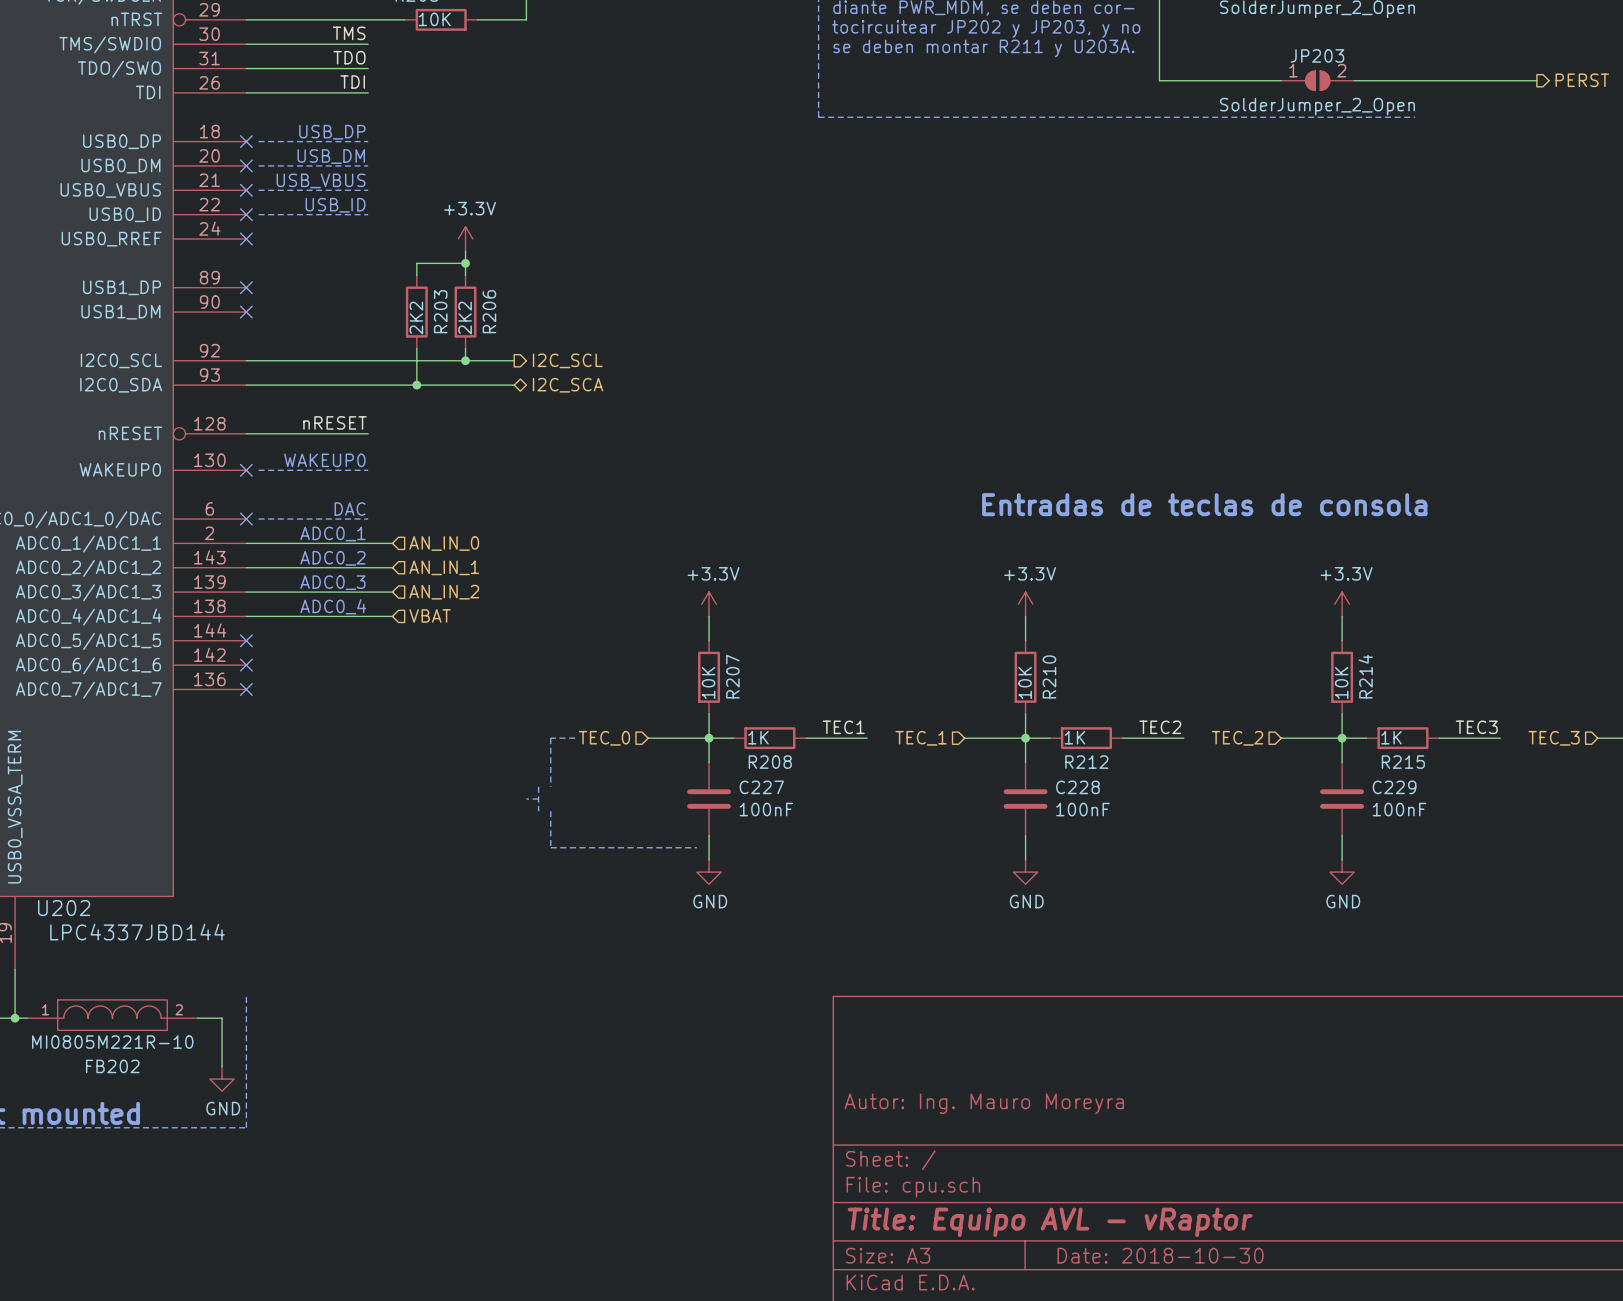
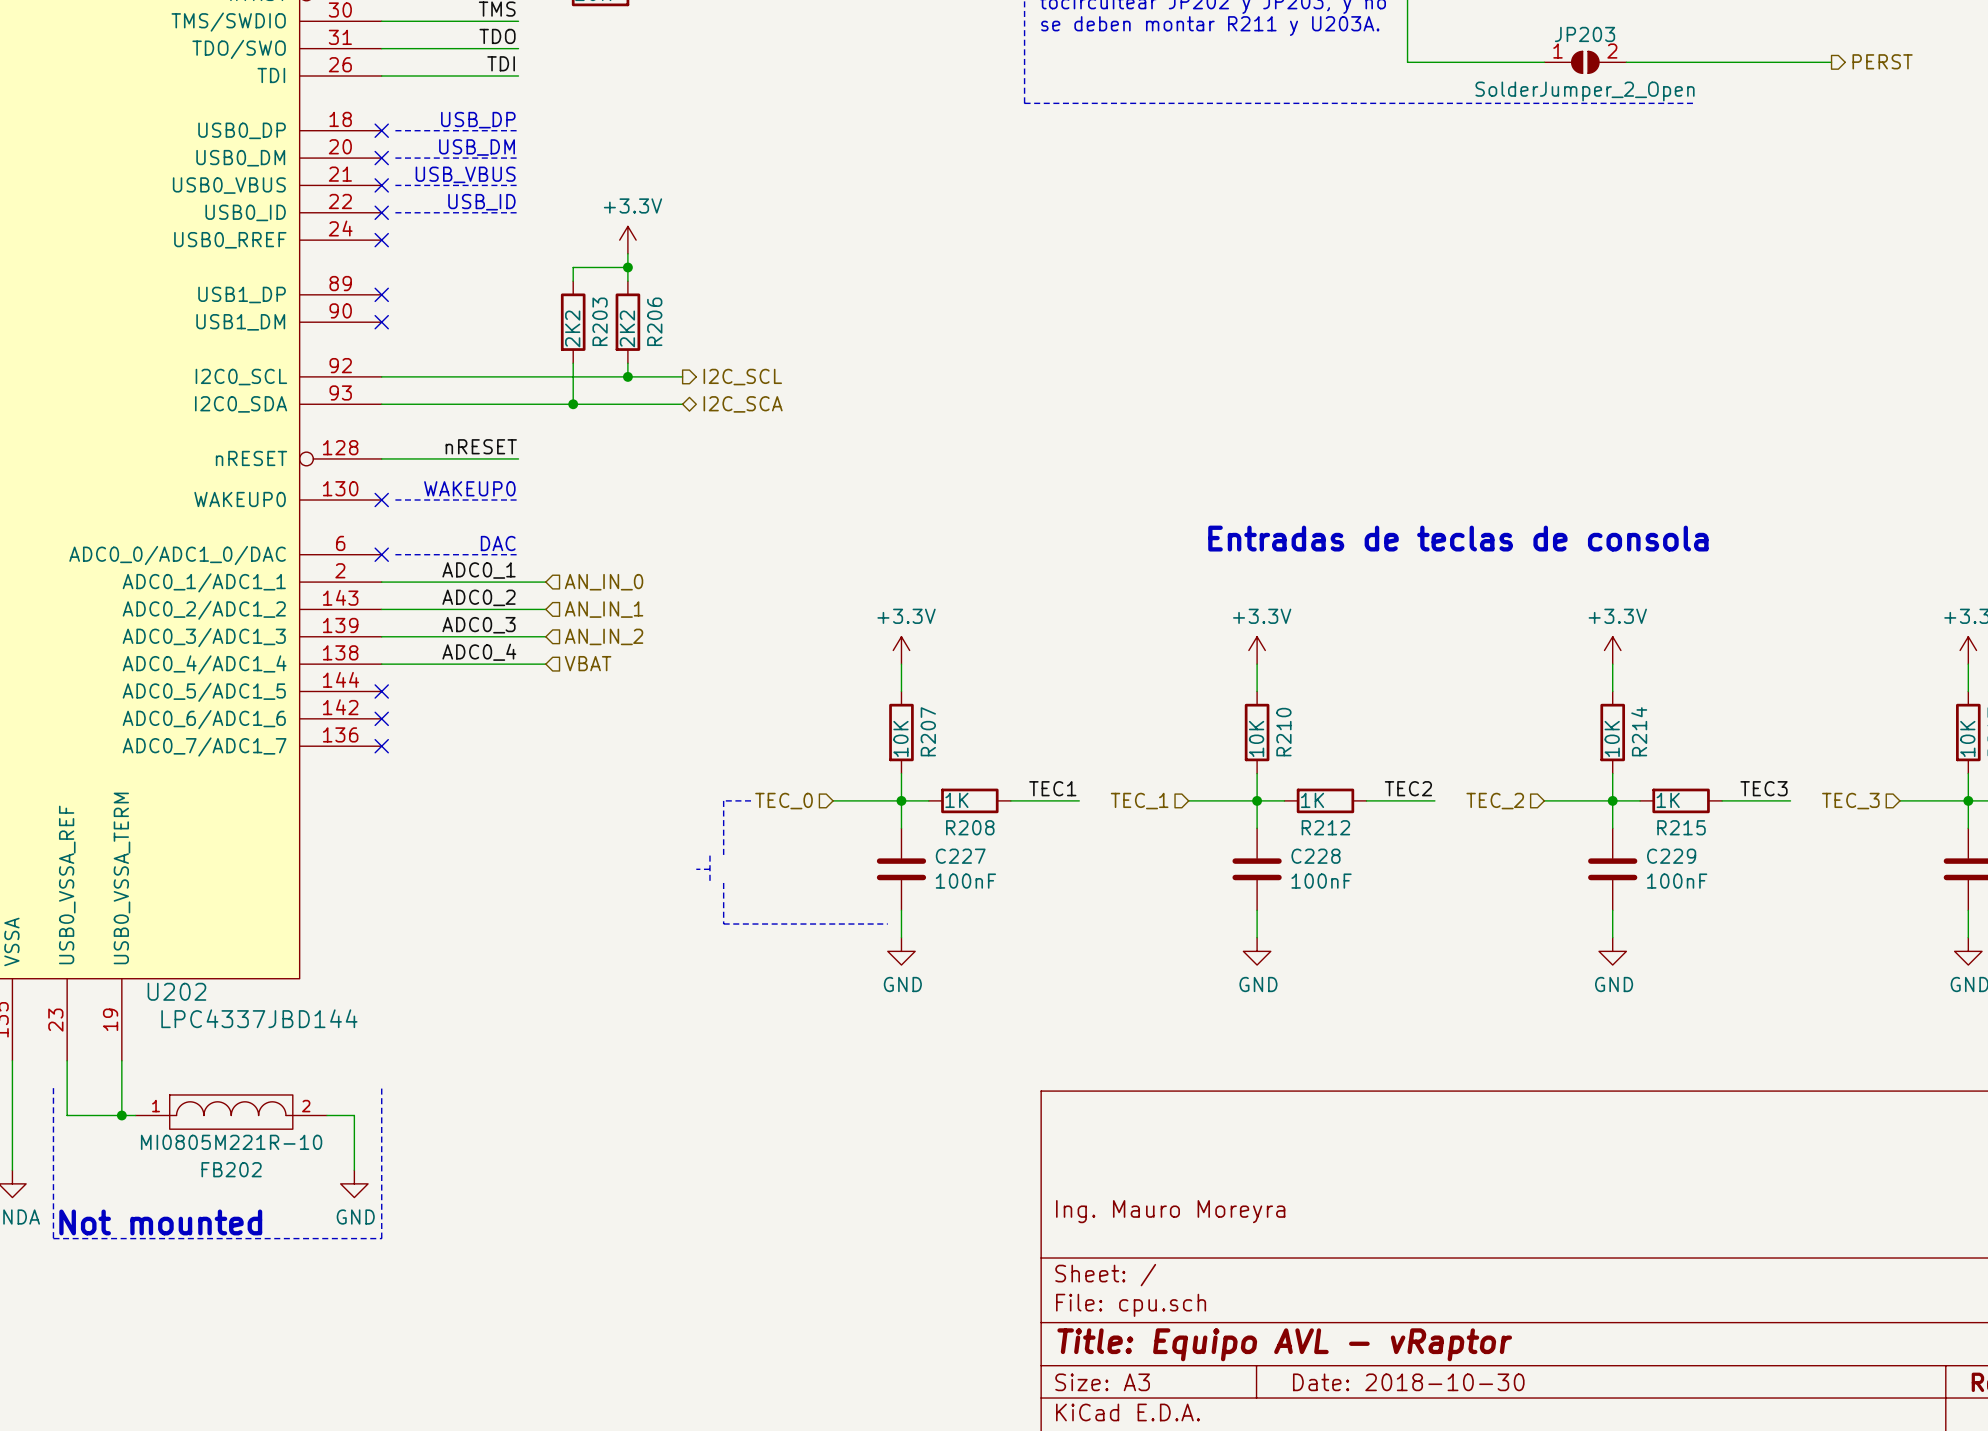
text: ADC0_1 (332, 533) -> none
label: none -> ADC0_1 (478, 570)
label: none -> ADC0_2 (478, 597)
text: ADC0_2 (332, 558) -> none
label: none -> ADC0_3 (478, 625)
text: ADC0_3 (332, 582) -> none
label: none -> ADC0_4 (479, 652)
text: ADC0_4 (333, 606) -> none
title block: Autor: Ing. Mauro Moreyra (984, 1103) -> Ing. Mauro Moreyra (1170, 1211)

